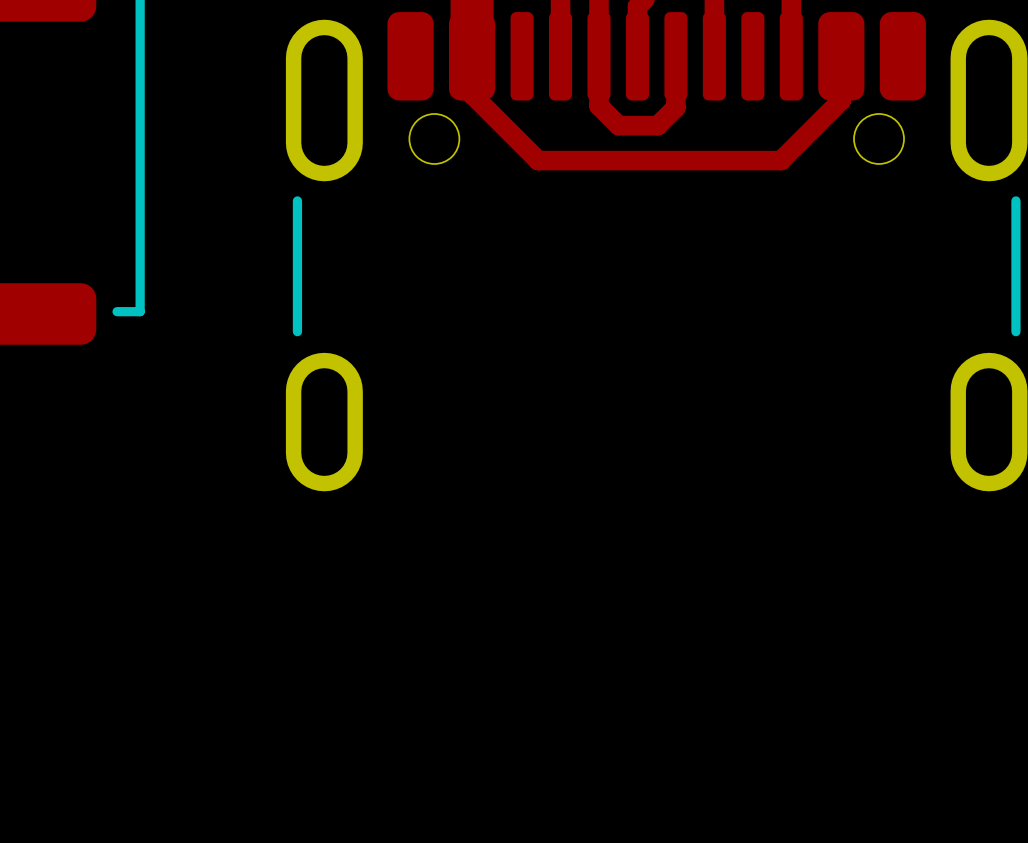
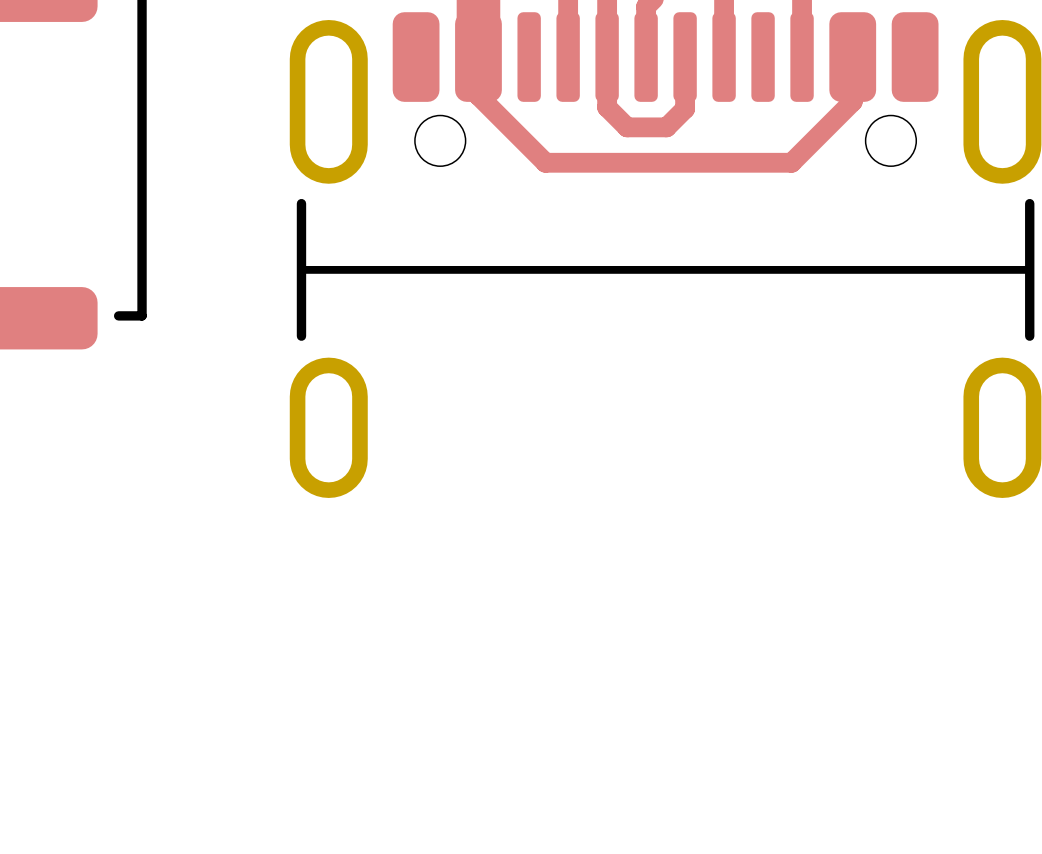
line: none -> (301, 269) (1029, 269)

